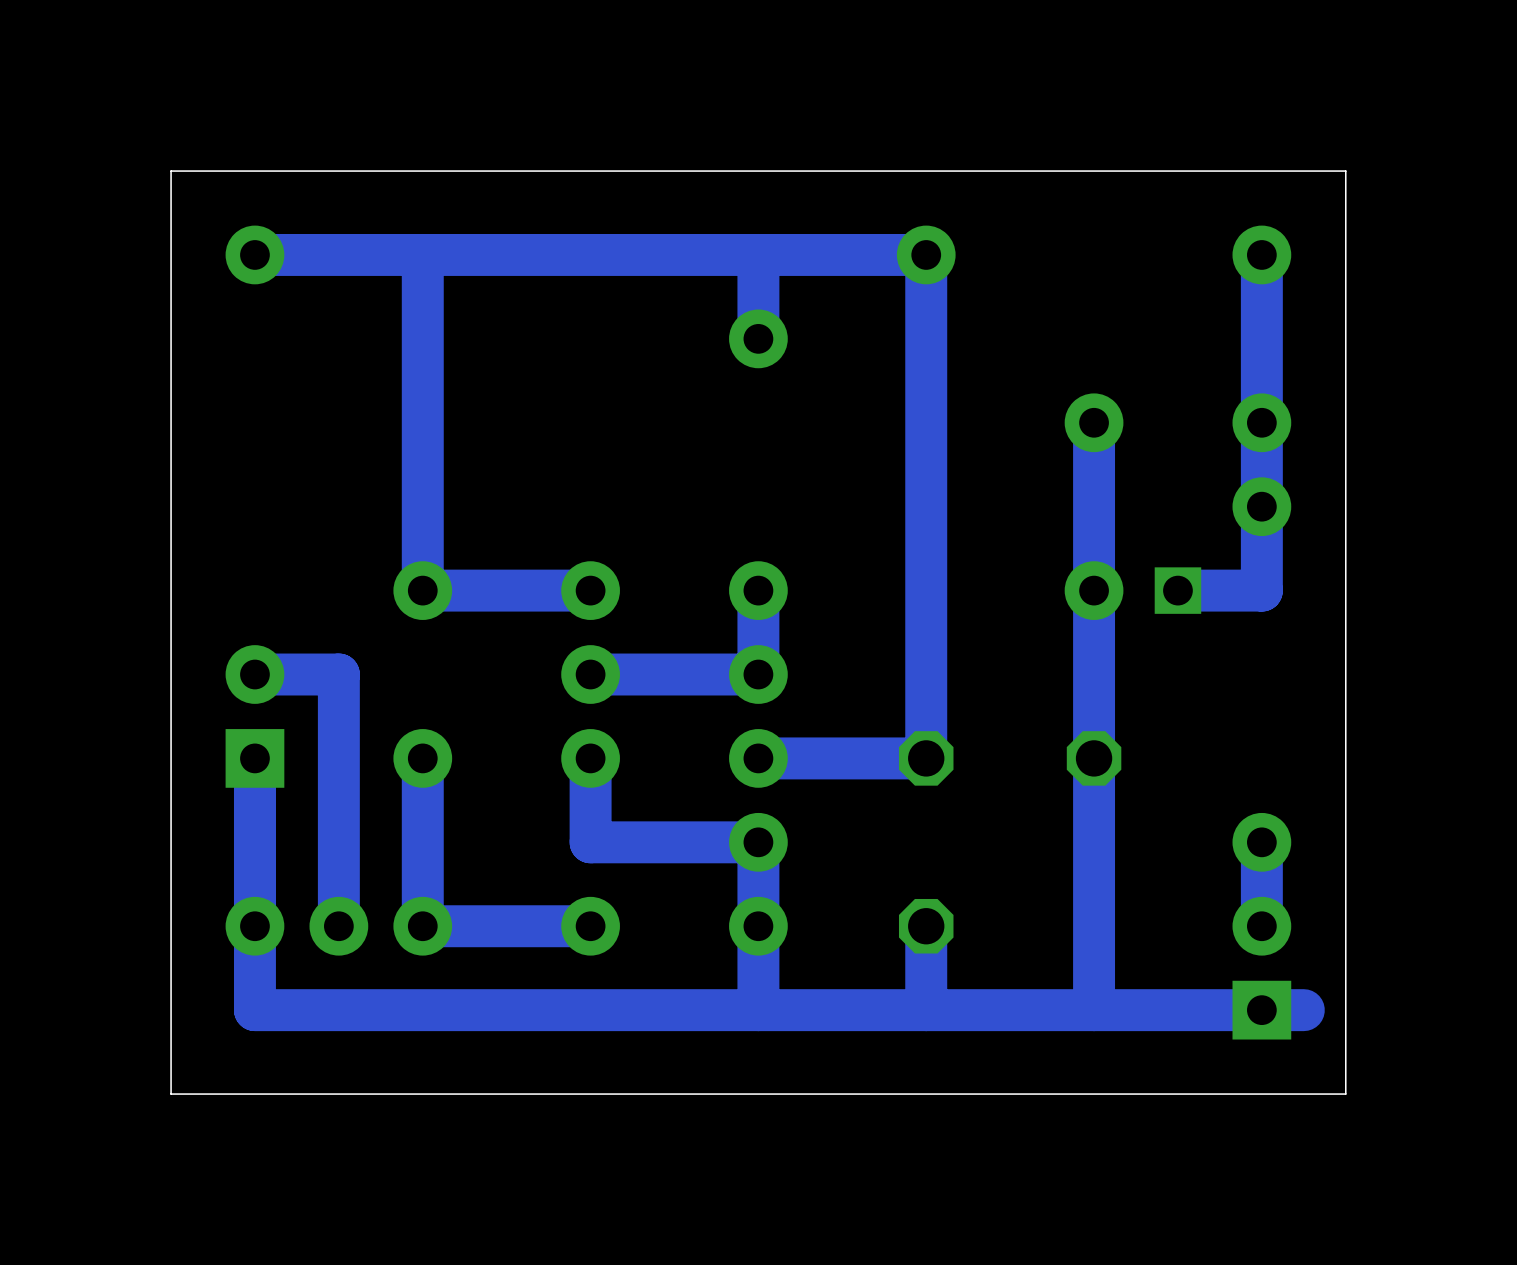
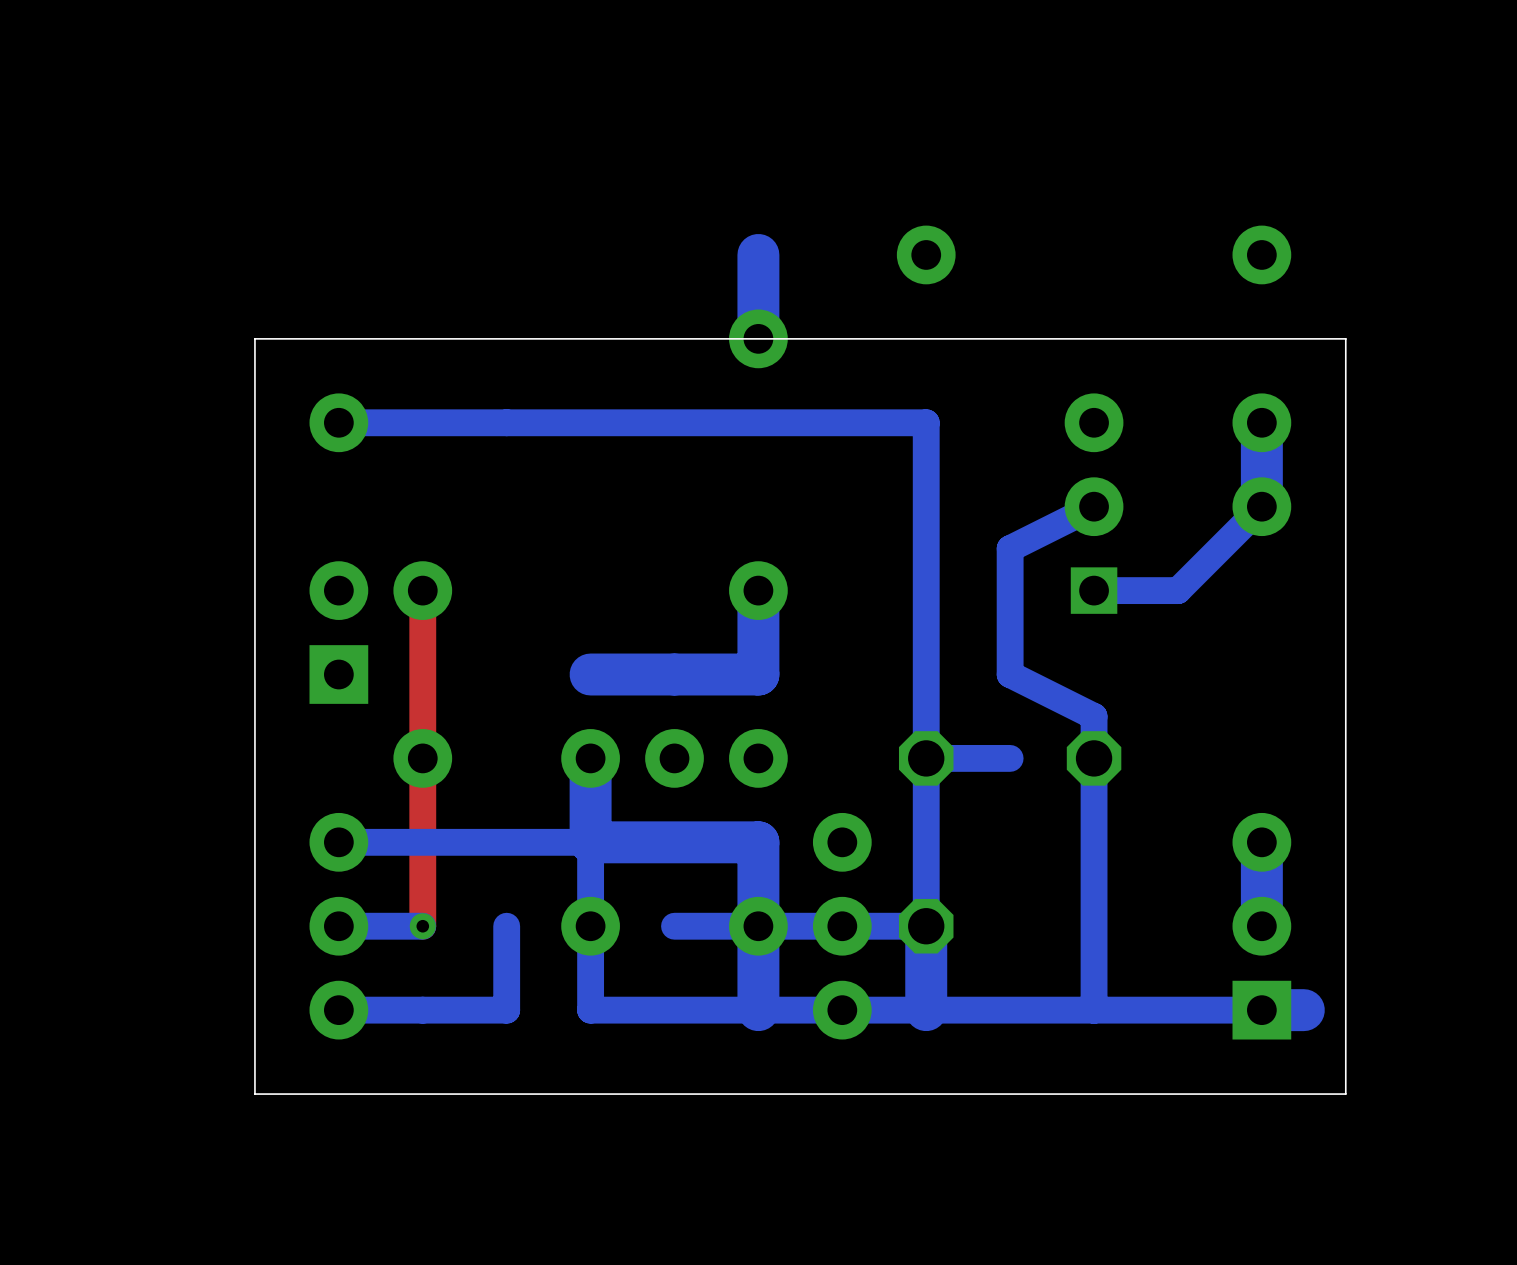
bottom track: (254, 254) (926, 254) (926, 422) -> (338, 422) (926, 422)
part position: (254, 254) -> (338, 422)
bottom track: (422, 254) (422, 590) (590, 590) -> none
bottom track: (1261, 254) (1261, 422) -> none
board edge: (1345, 338) (1345, 171) (171, 171) (171, 1094) (254, 1094) -> (1345, 338) (254, 338) (254, 1094)
bottom track width: thick (926, 422) (926, 758) -> thin (926, 422) (926, 758)
bottom track: (1094, 422) (1094, 716) -> (1094, 506) (1010, 548) (1010, 674) (1094, 716)
bottom track: (1261, 506) (1261, 590) (1177, 590) -> (1261, 506) (1177, 590) (1094, 590)
top track: none -> (422, 590) (422, 926)
part rotation: 0° (1132, 590) -> 90° clockwise (1094, 545)
bottom track: (254, 674) (338, 674) (338, 926) -> (422, 926) (338, 926)
part: (590, 674) -> none
part position: (254, 716) -> (338, 632)
bottom track width: thick (1094, 716) (1094, 1010) -> thin (1094, 716) (1094, 1010)
bottom track: (254, 758) (254, 1010) (338, 1010) -> none
bottom track: (422, 758) (422, 926) (590, 926) -> none
part: none -> (674, 758)
part: (758, 758) -> none
bottom track: (926, 758) (758, 758) -> none
bottom track: none -> (1010, 758) (926, 758) (926, 926) (674, 926)
bottom track: none -> (338, 842) (590, 842) (590, 1010)
part rotation: 0° (338, 926) -> 90° clockwise (338, 926)
via: none -> (422, 926)
part: none -> (842, 926)
bottom track width: thick (506, 1010) (338, 1010) -> thin (506, 1010) (338, 1010)
bottom track: (590, 1010) (506, 1010) -> (506, 926) (506, 1010)
bottom track width: thick (1261, 1010) (590, 1010) -> thin (1261, 1010) (590, 1010)

